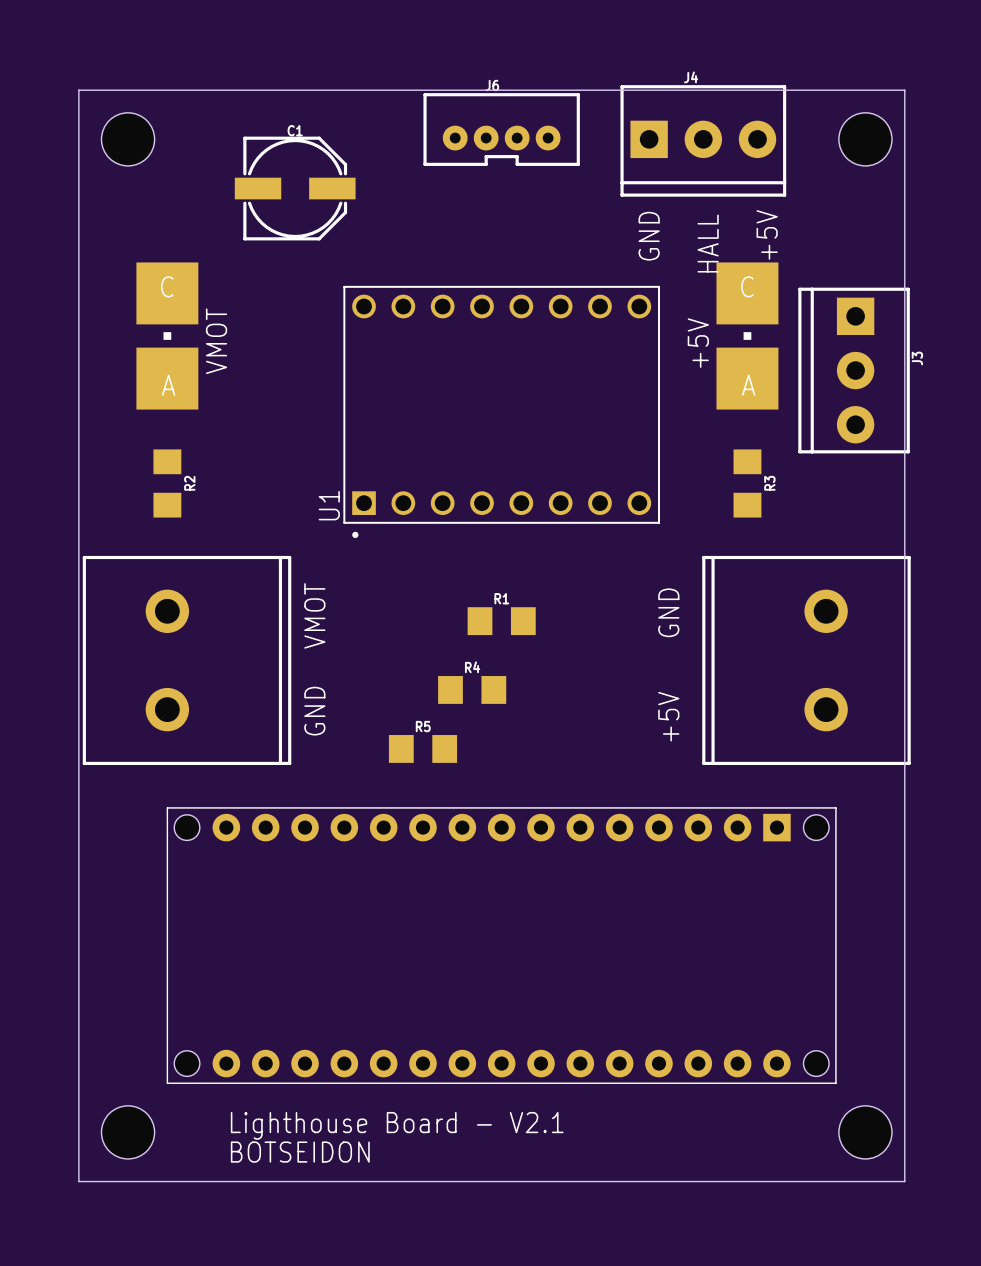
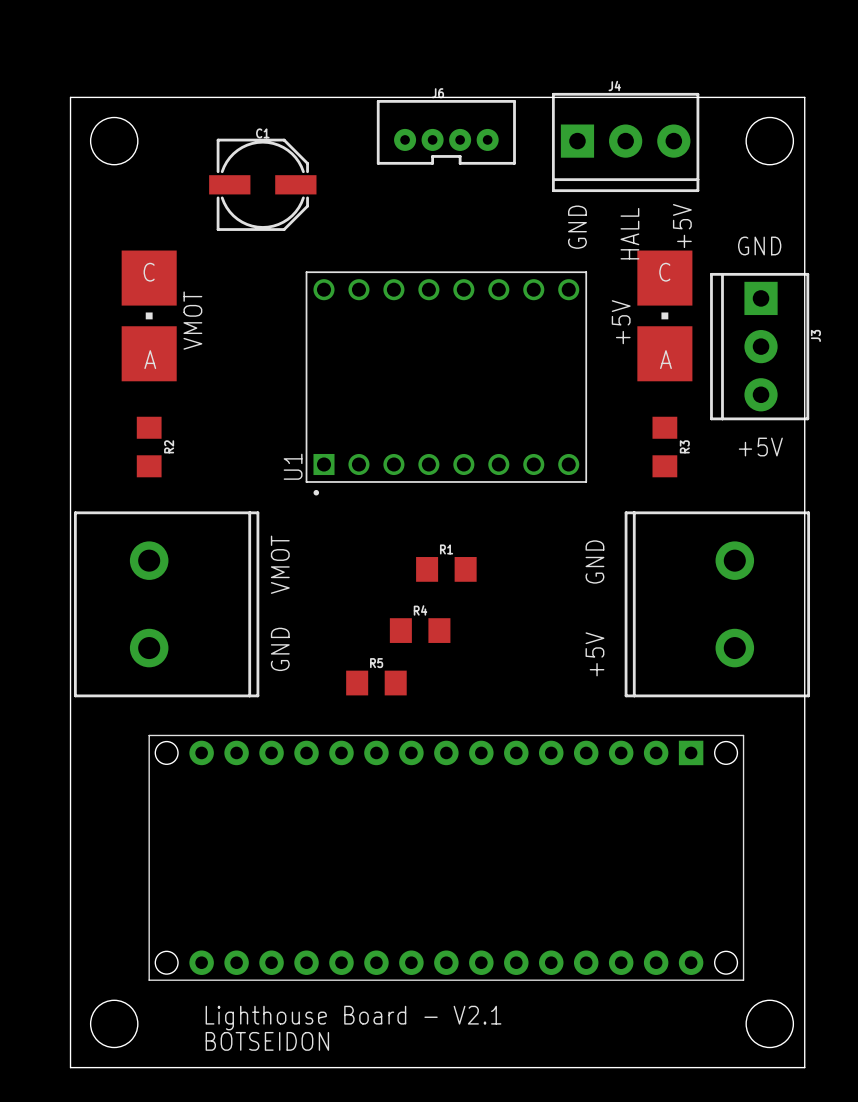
text: none -> GND (759, 245)
text: none -> +5V (760, 447)

